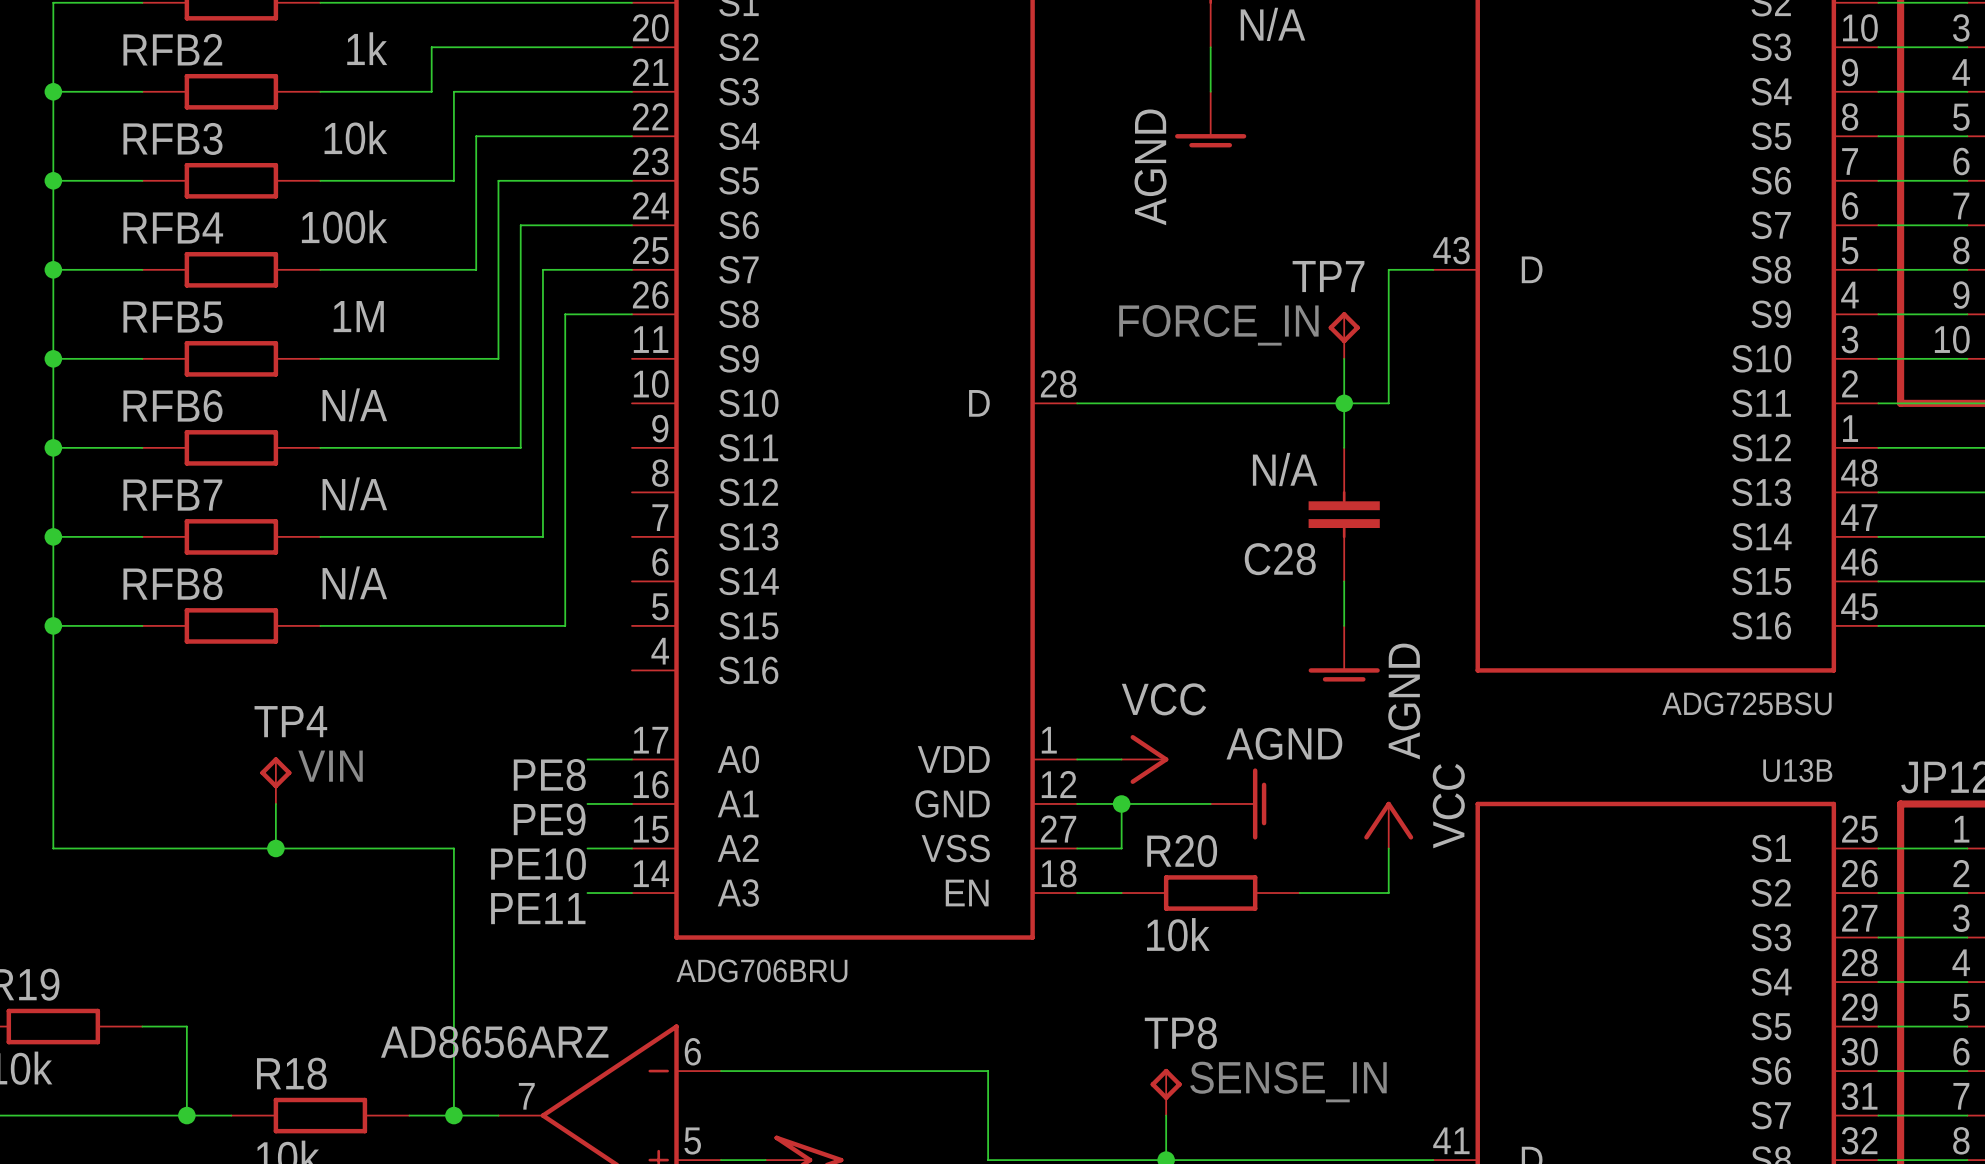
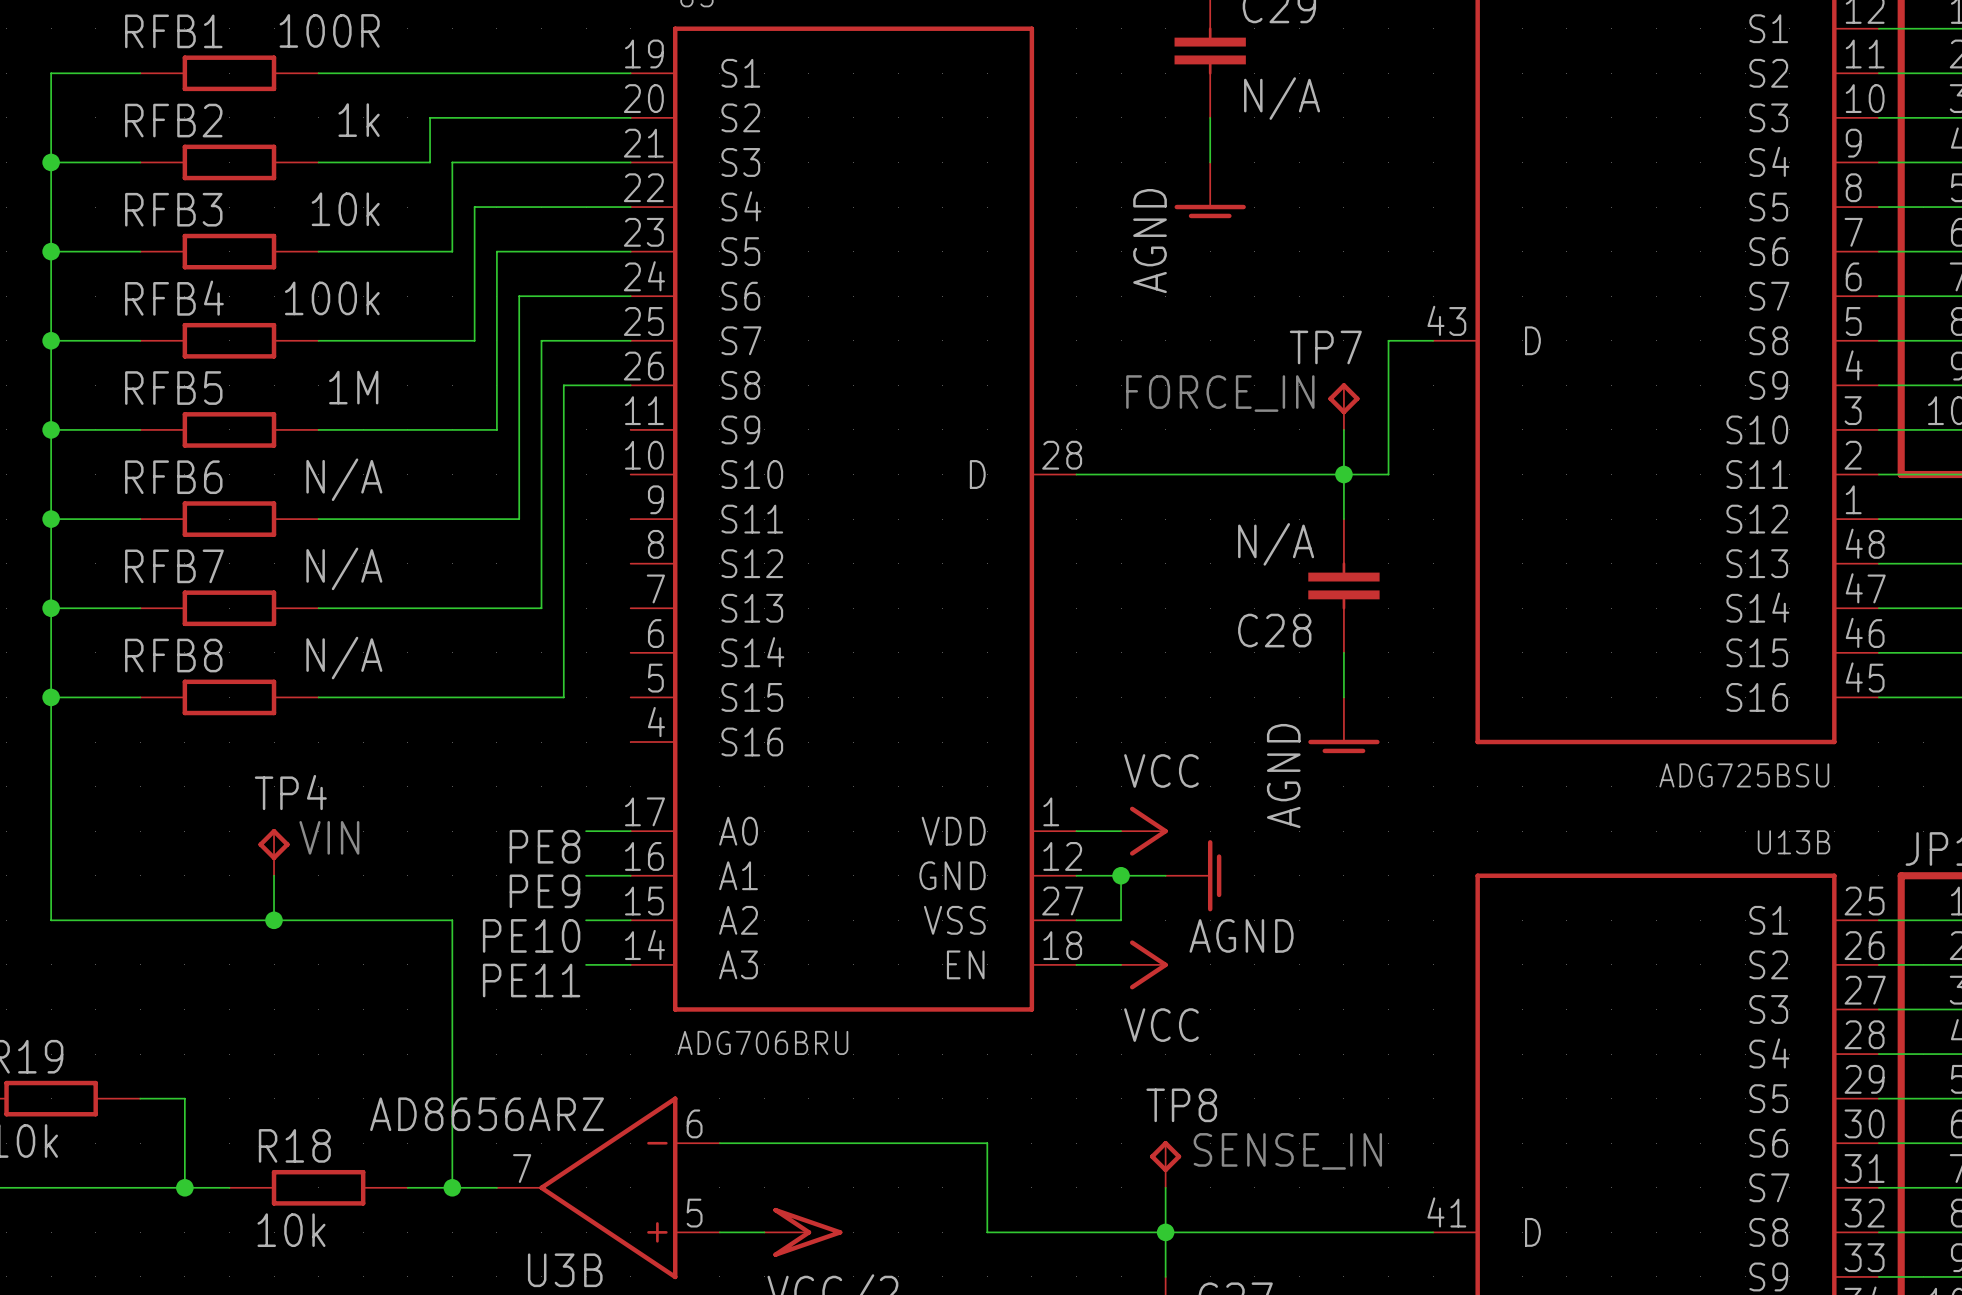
power symbol text position: AGND (1404, 701) -> AGND (1283, 776)
power symbol text position: AGND (1284, 743) -> AGND (1241, 935)
power symbol position: AGND (1238, 803) -> AGND (1193, 875)
power symbol rotation: 0° (1388, 820) -> 90° clockwise (1148, 964)
power symbol position: VCC (1388, 825) -> VCC (1144, 964)
wire: (1388, 848) (1388, 893) (1299, 893) -> none
R20: 10k (1210, 893) -> none

